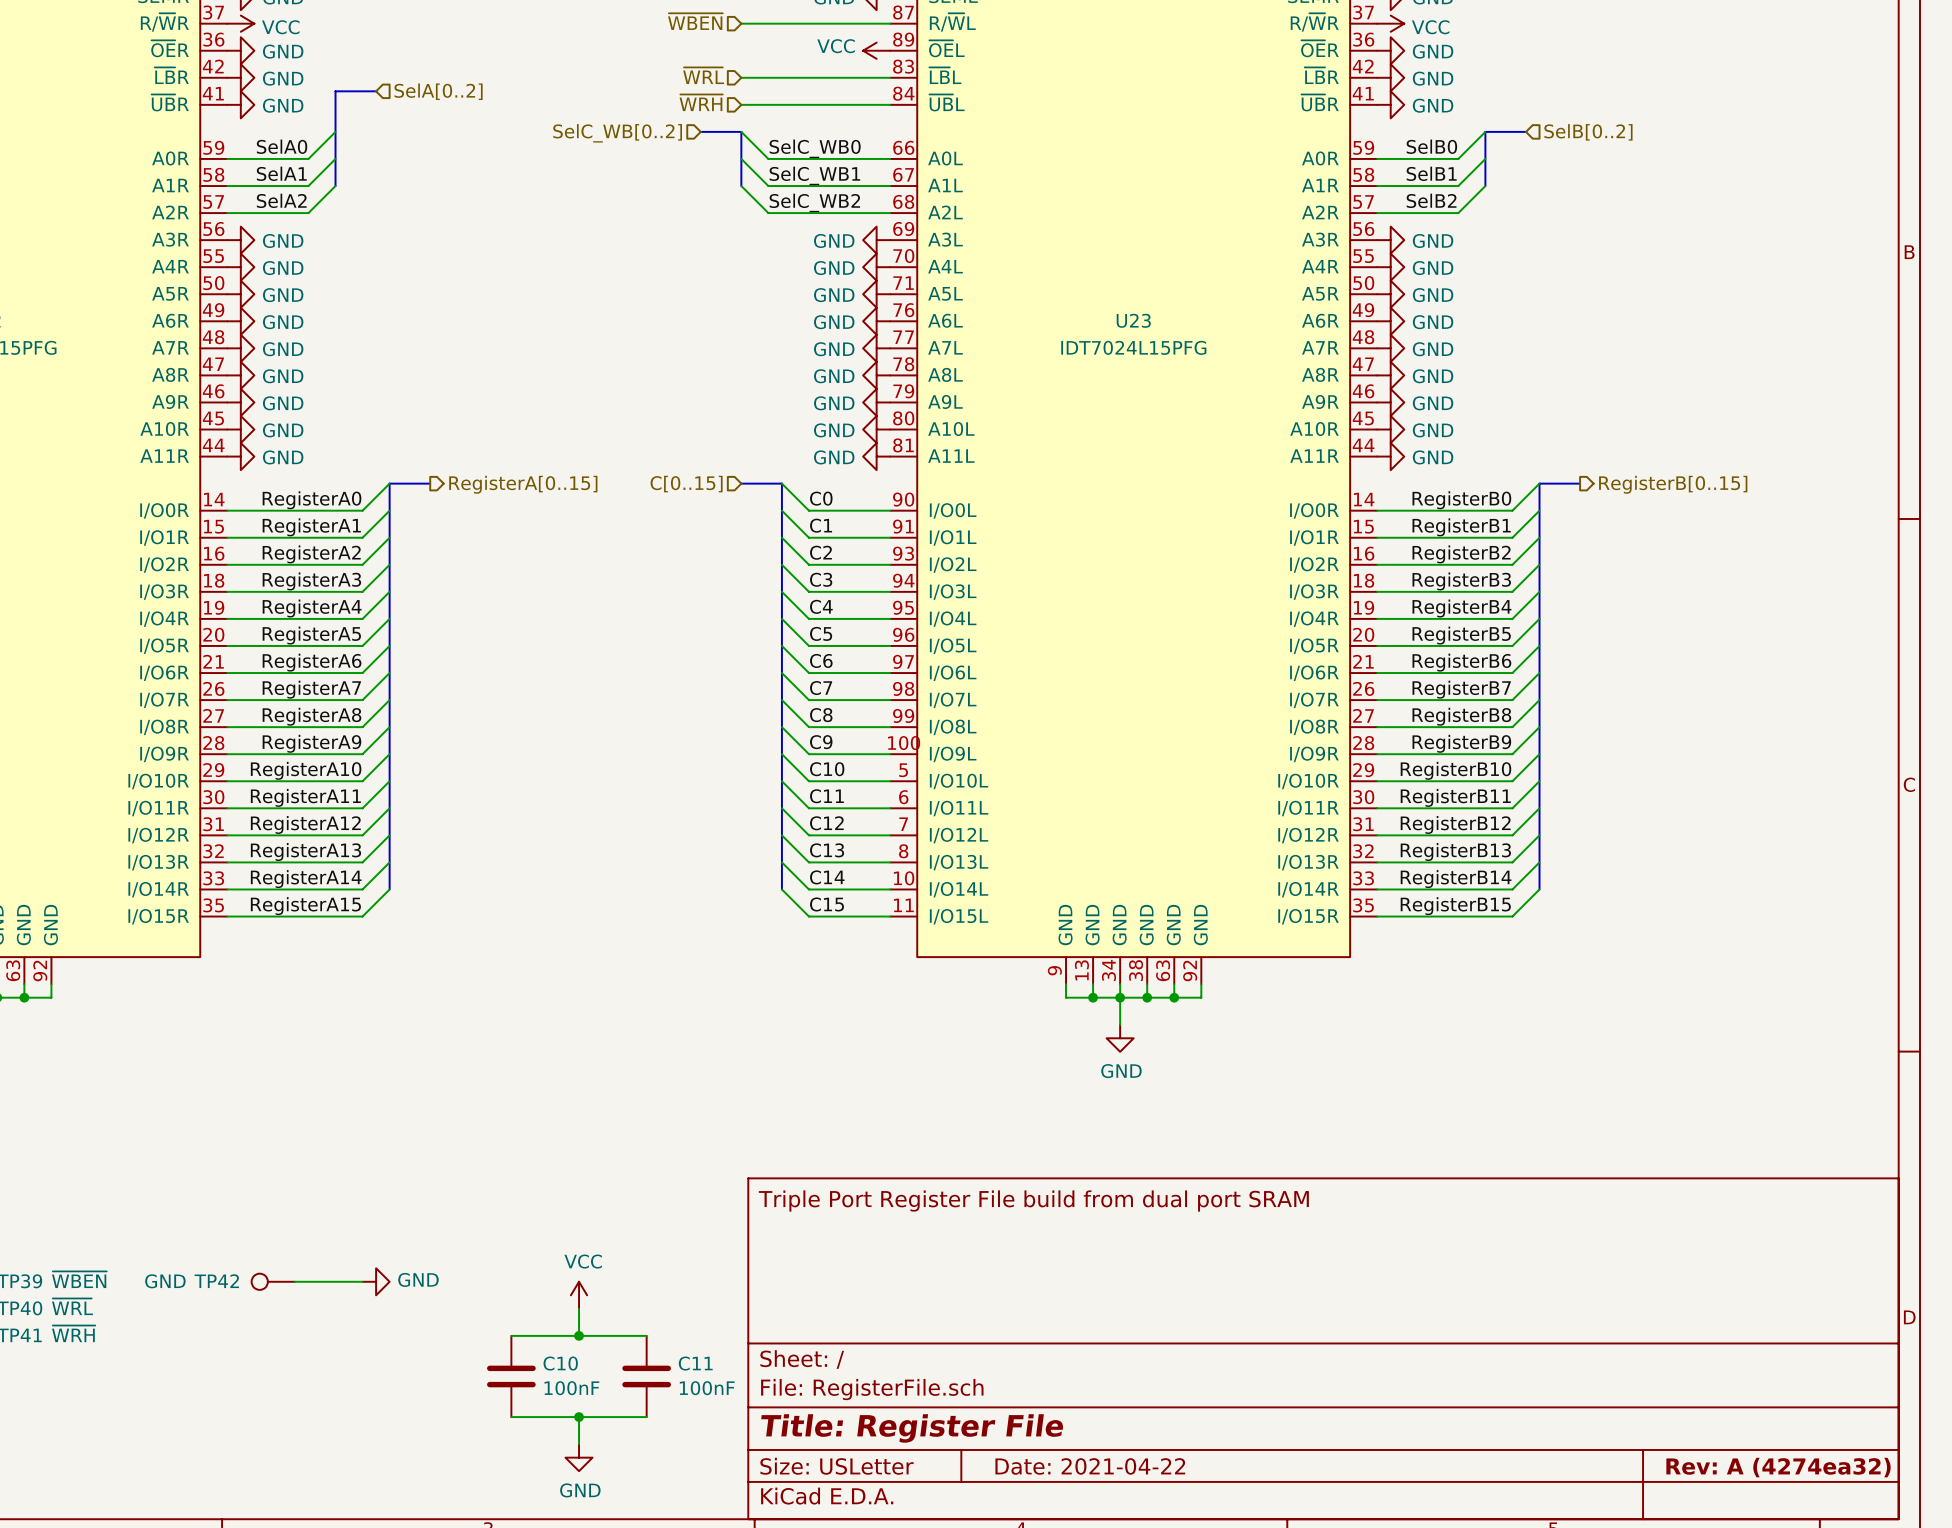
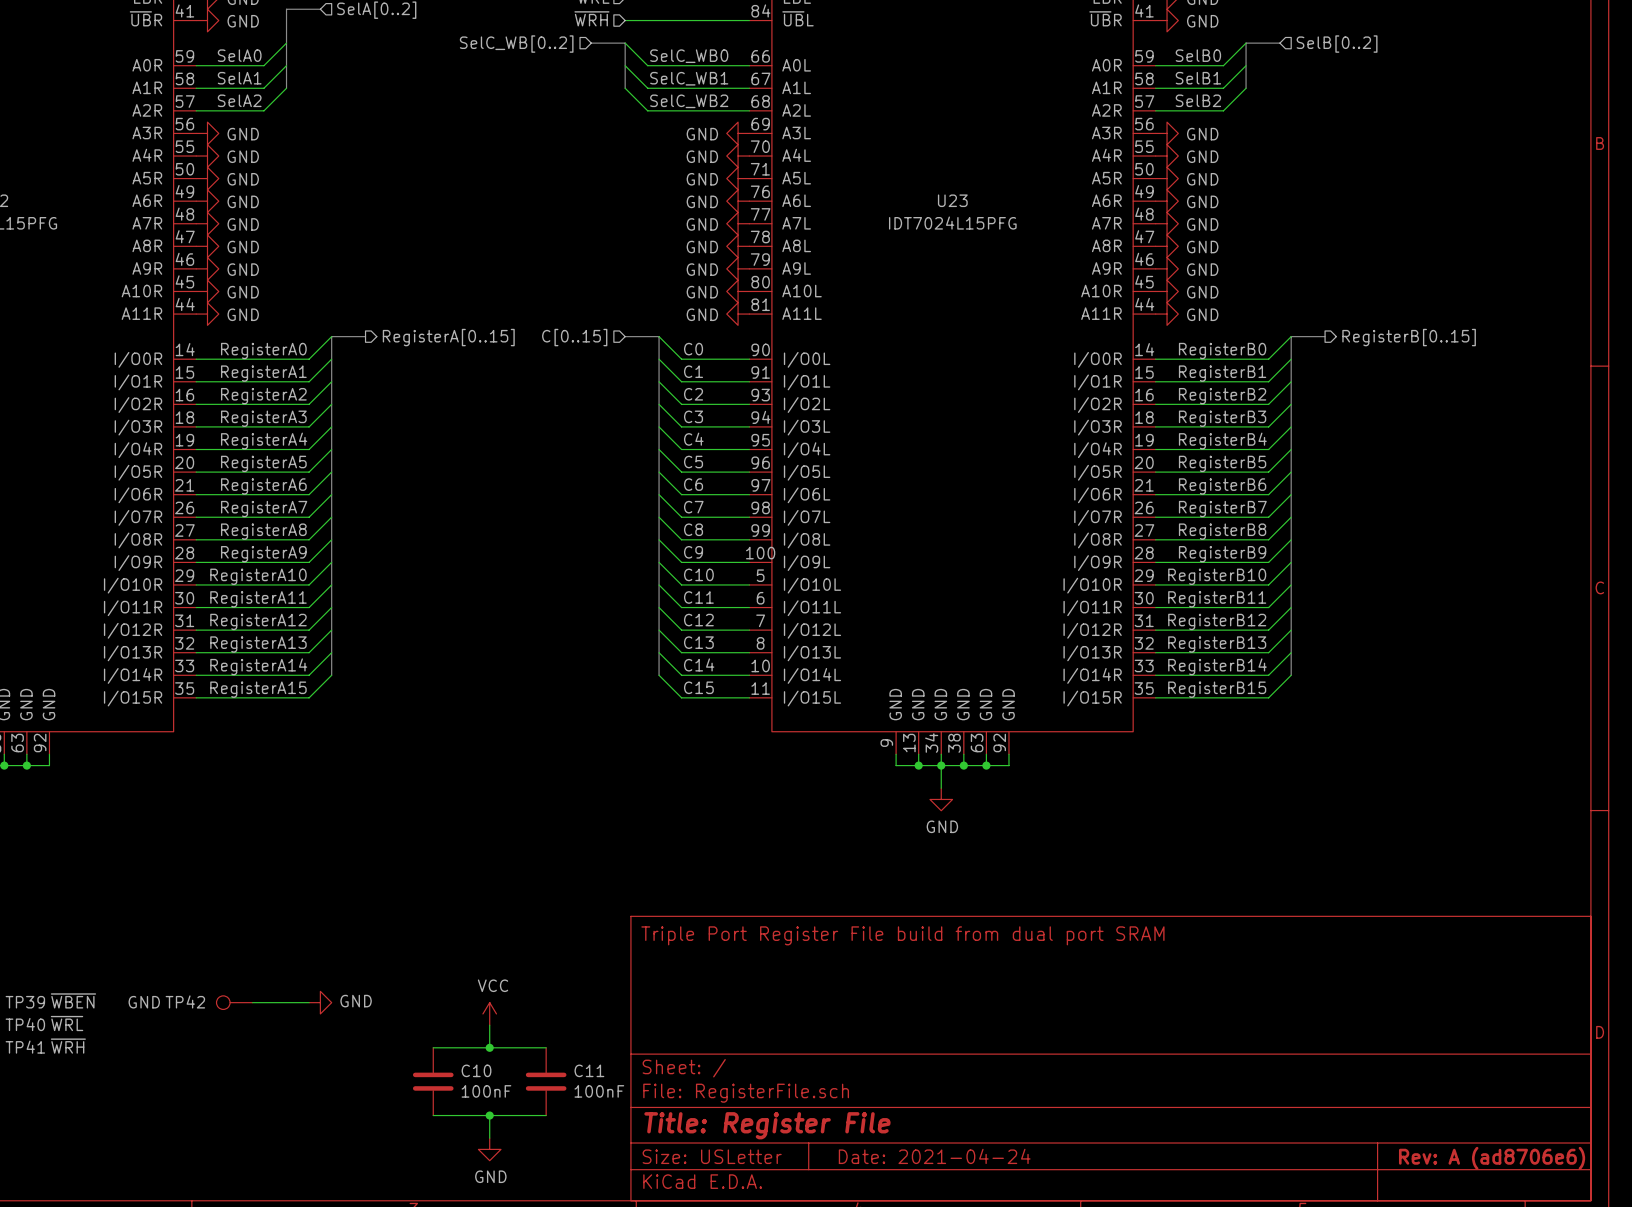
title block: Date: 2021-04-22 (1090, 1466) -> Date: 2021-04-24 (934, 1156)
title block: Rev: A (4274ea32) (1778, 1467) -> Rev: A (ad8706e6) (1492, 1158)

